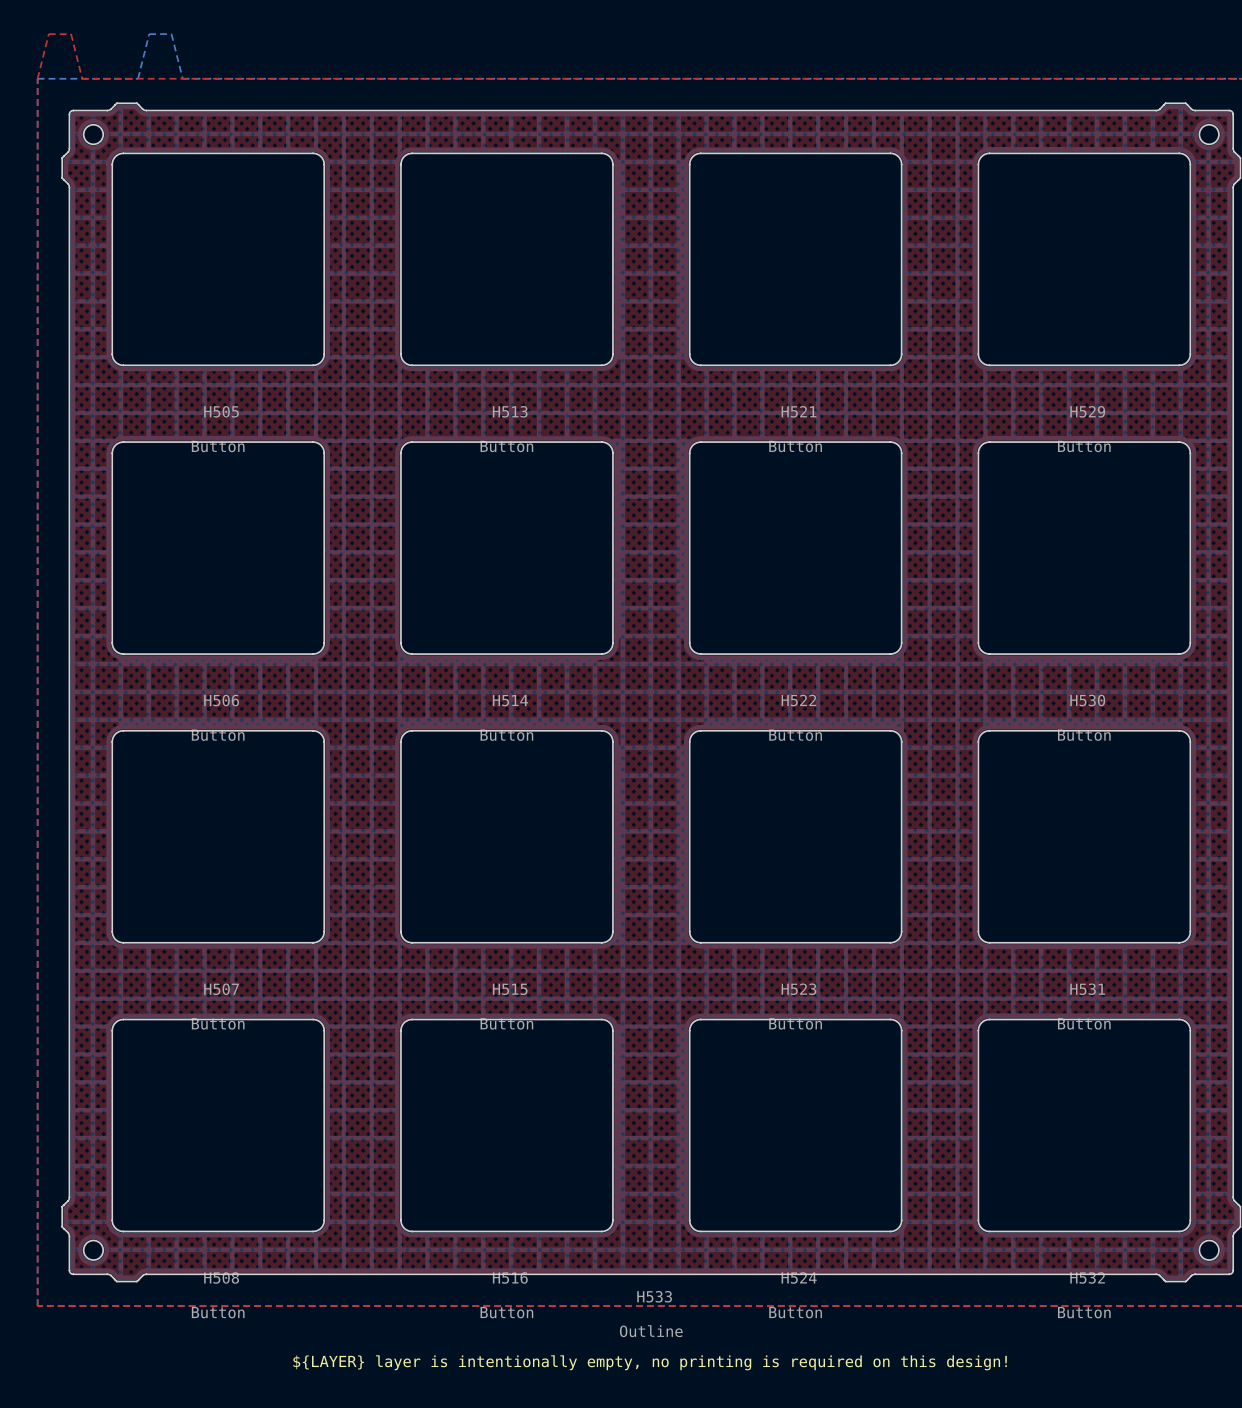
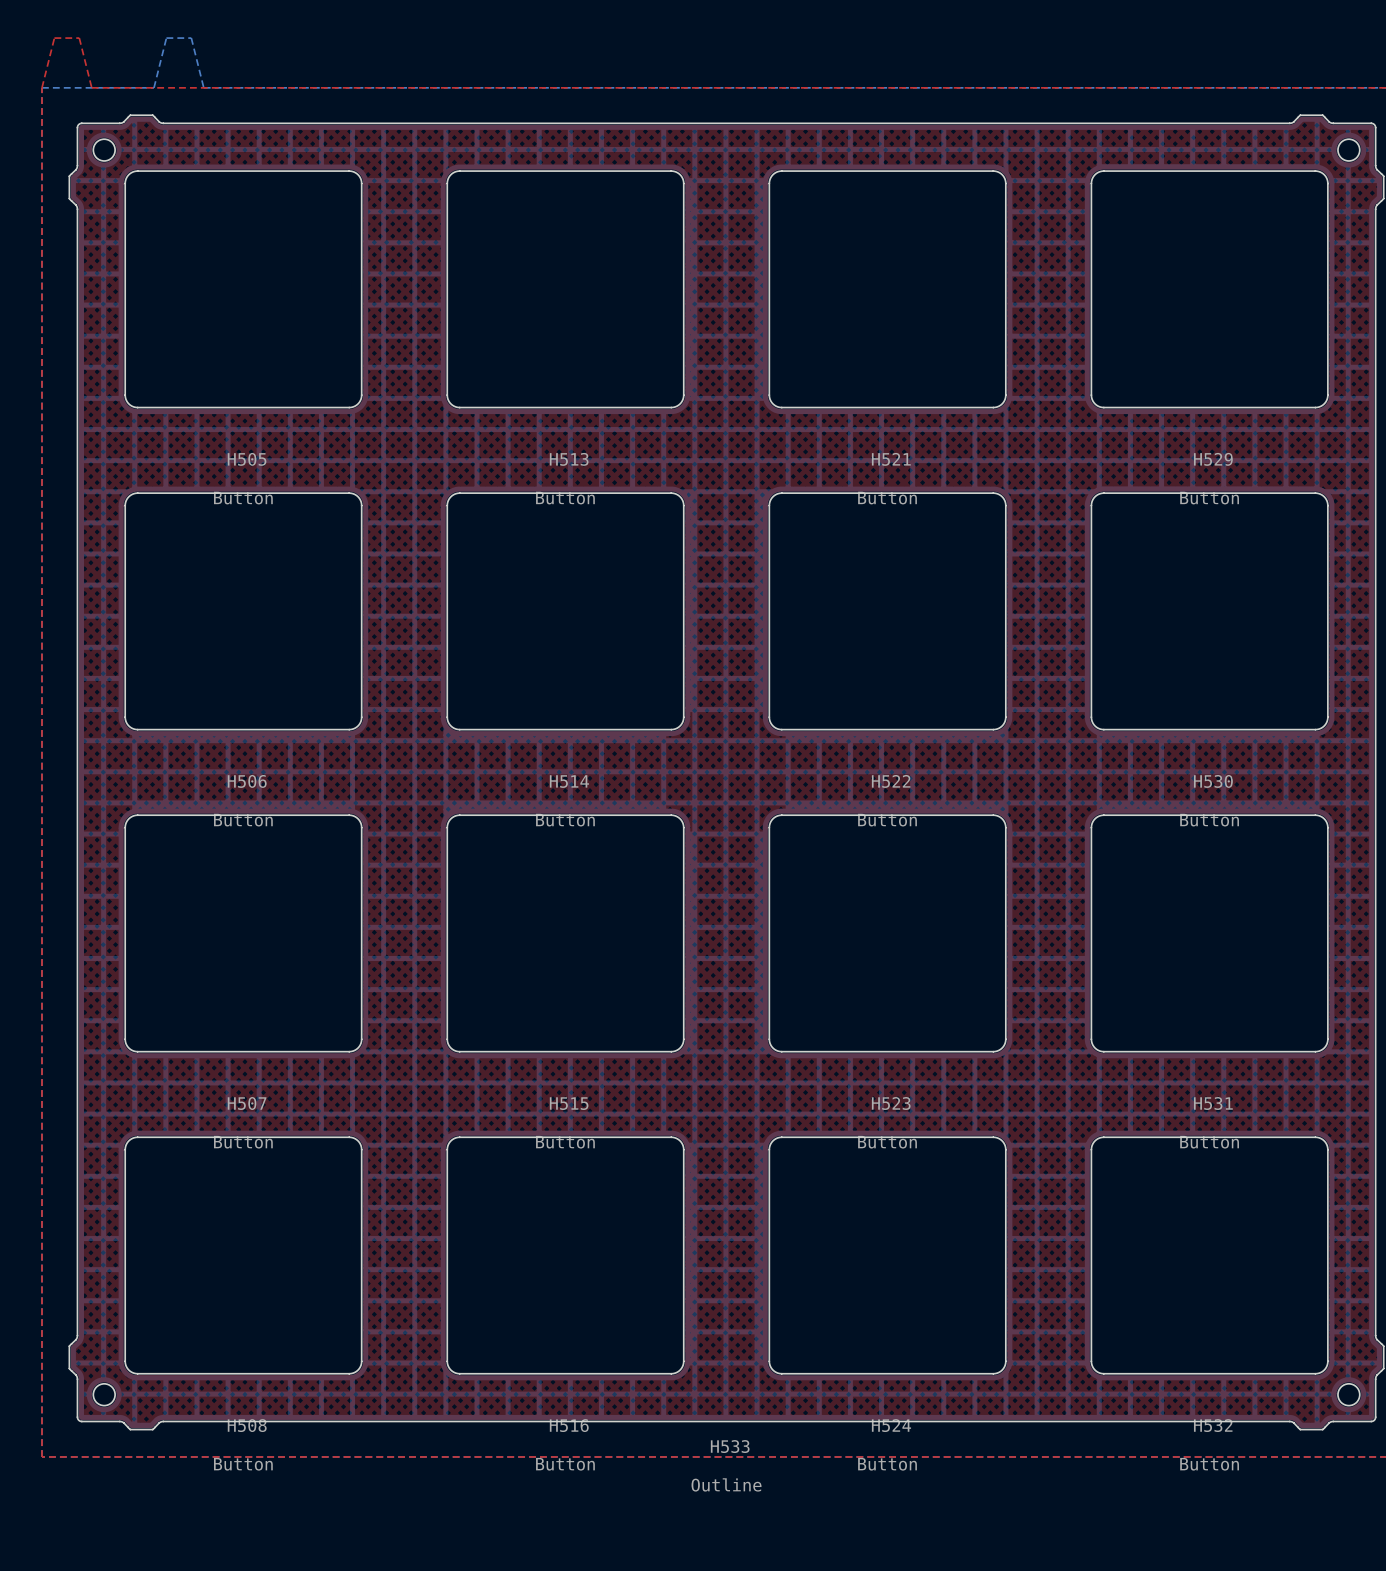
text: ${LAYER} layer is intentionally empty, no printing is required on this design! (650, 1362) -> none

